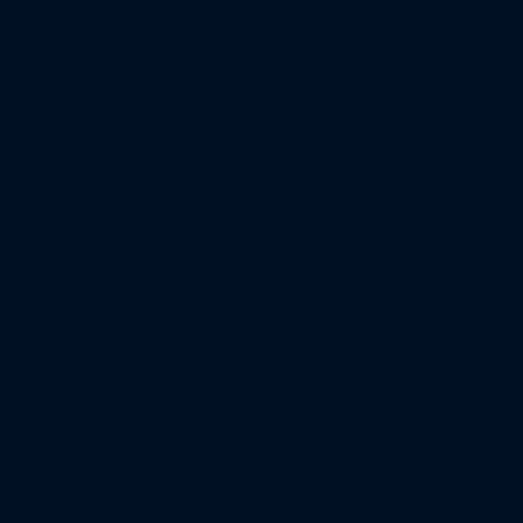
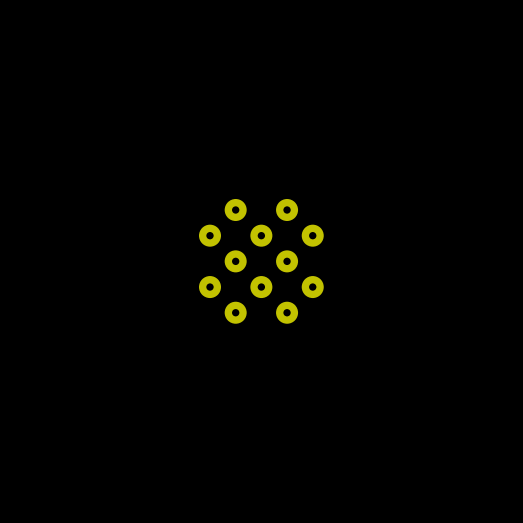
part: none -> (261, 261)

